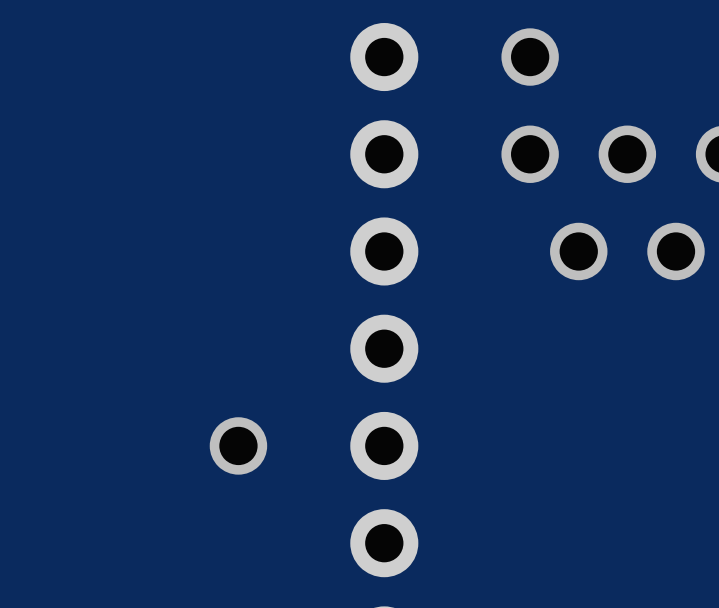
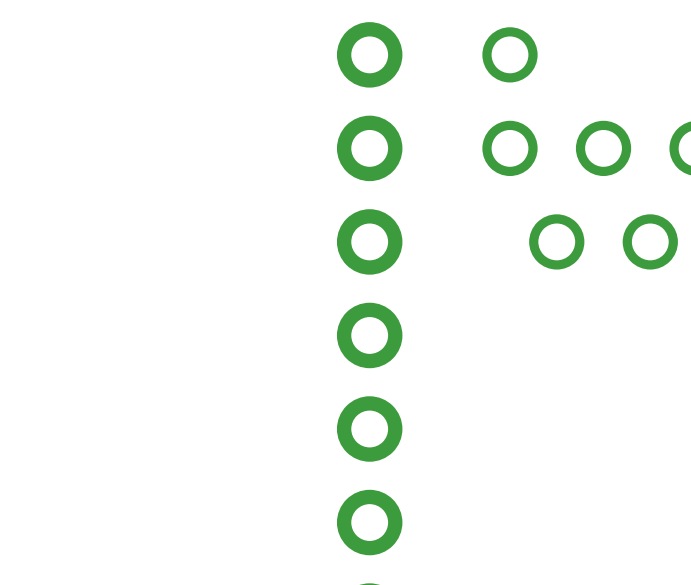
via: (238, 445) -> none

